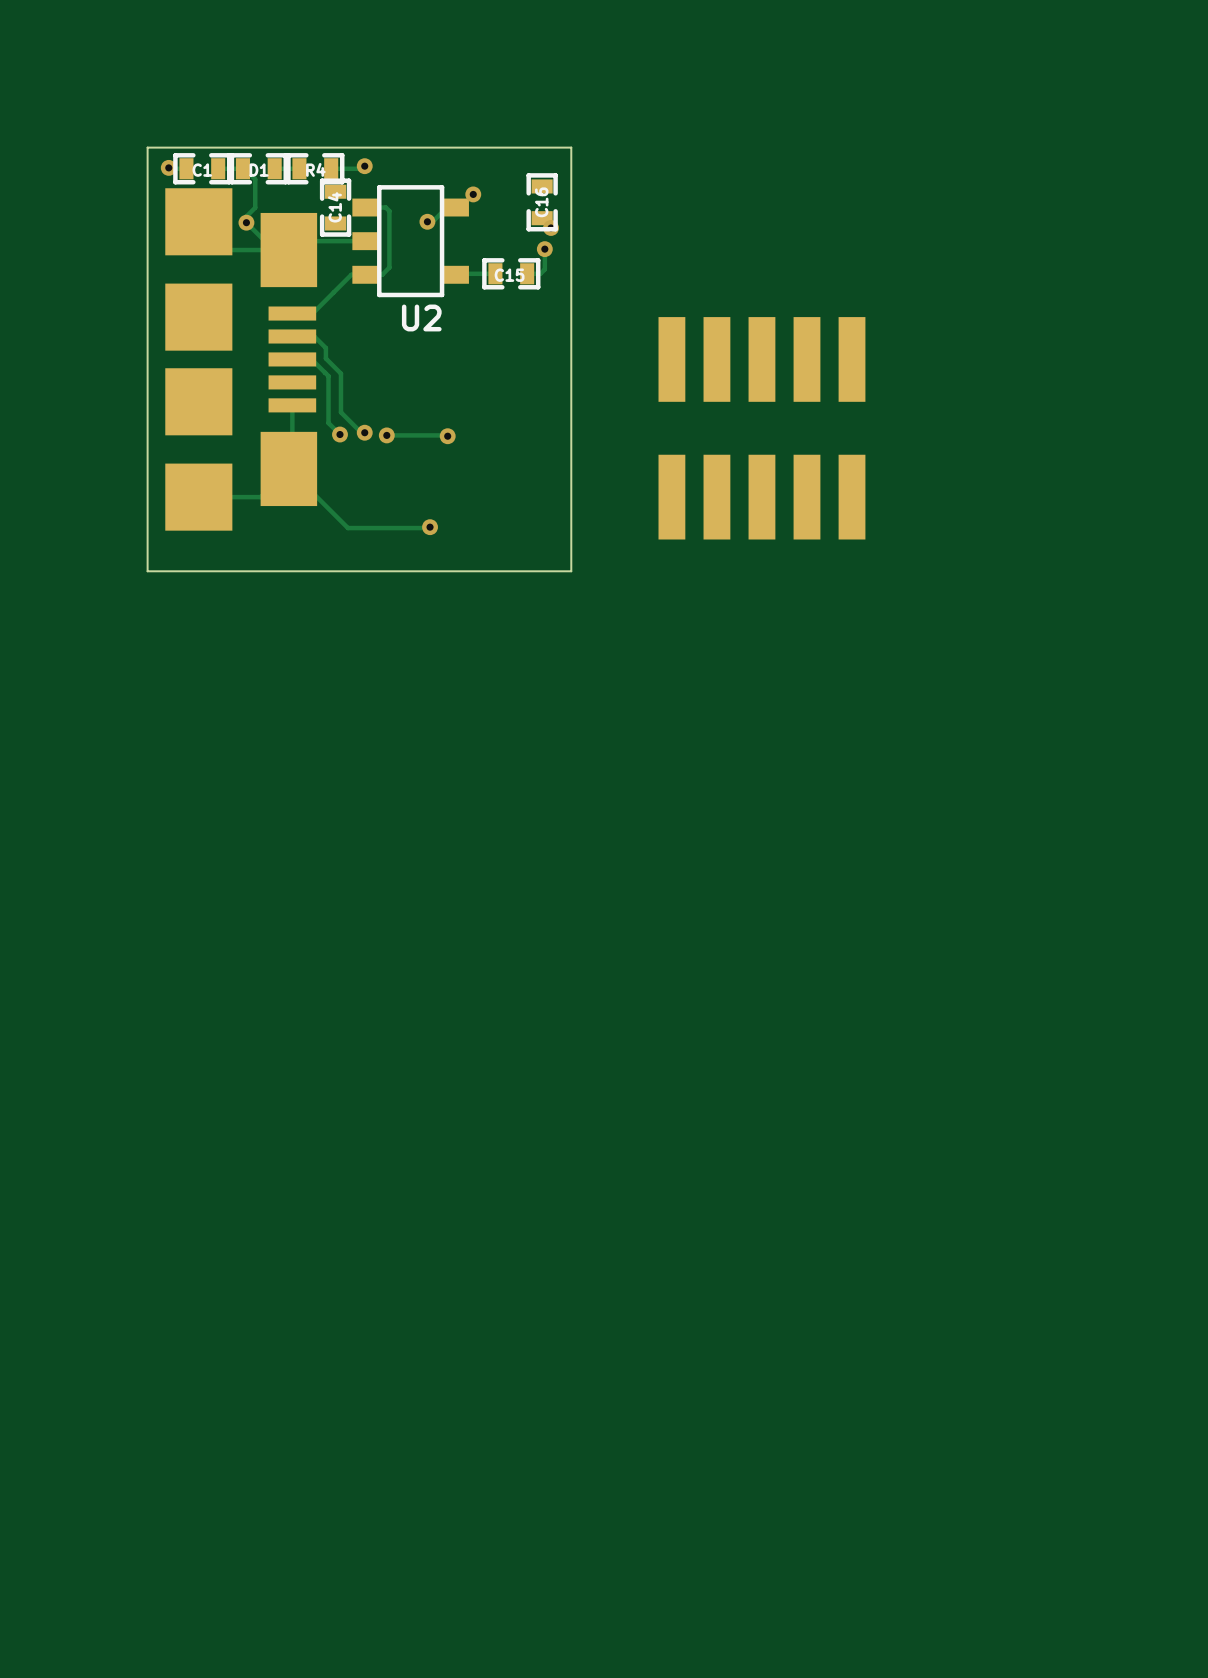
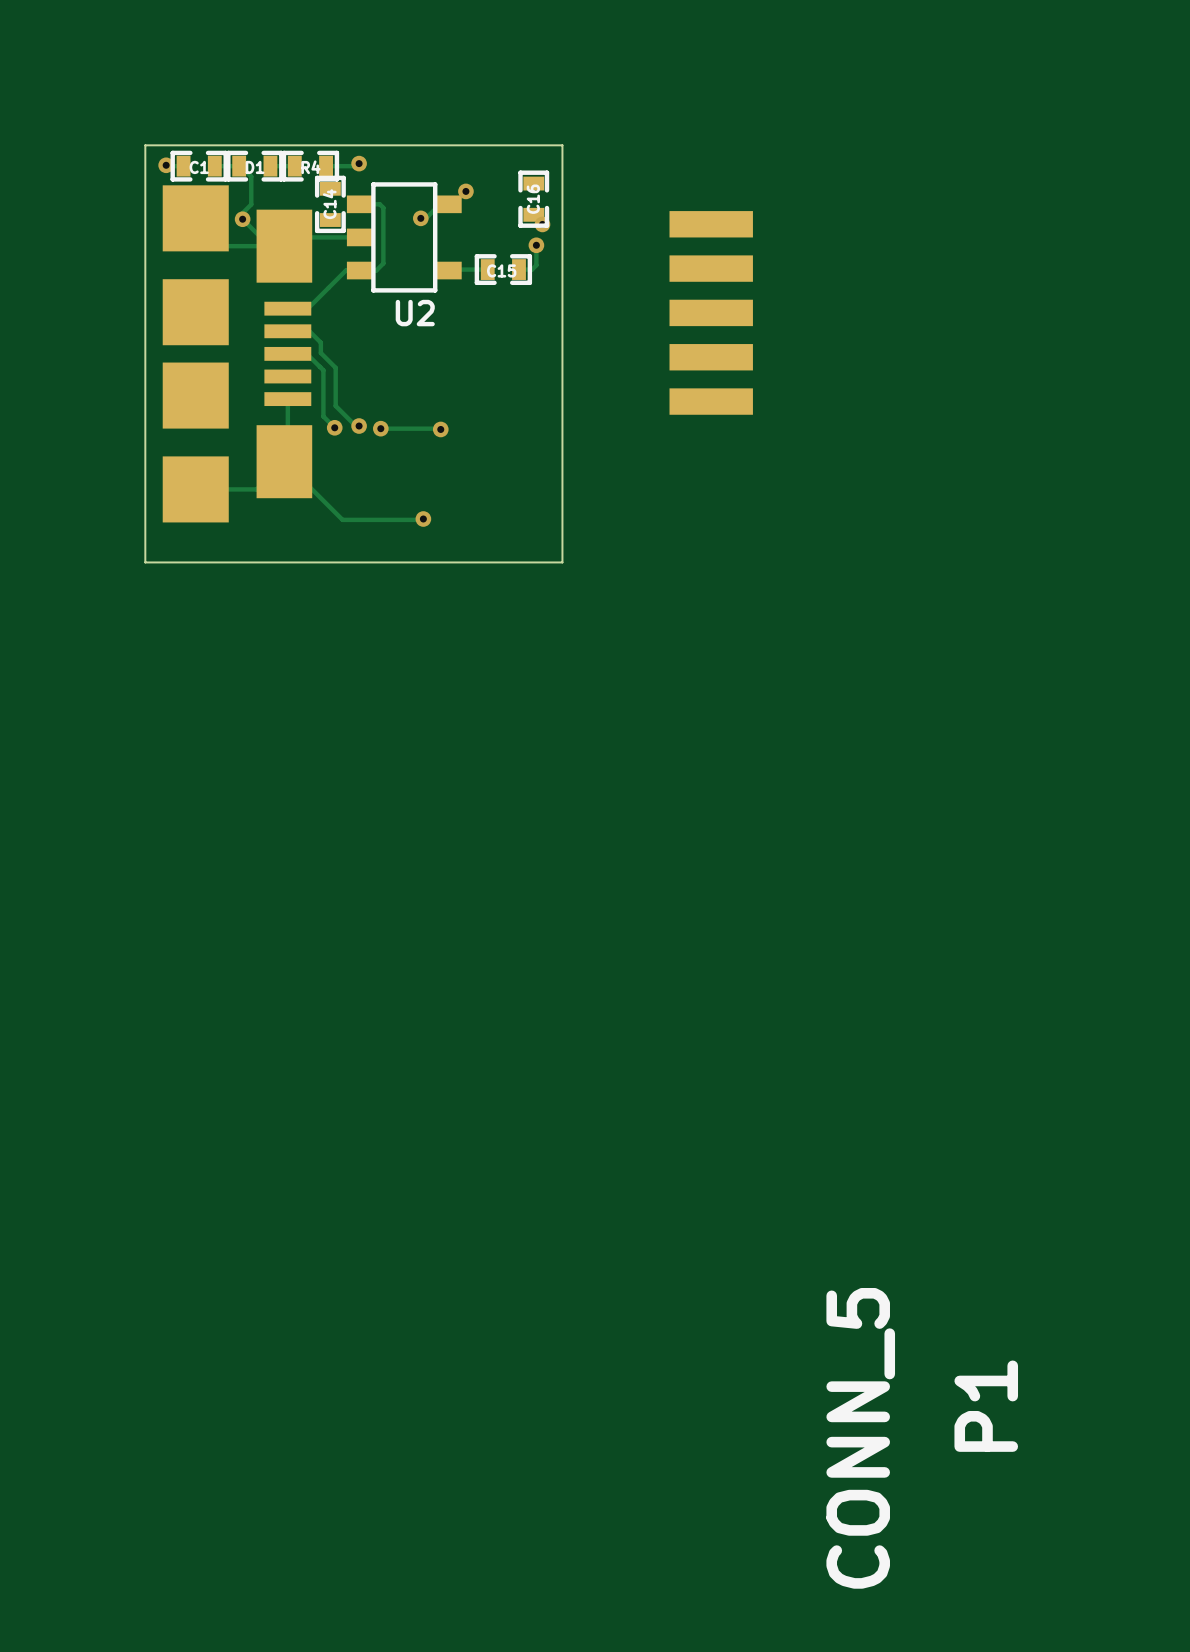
P1: none -> CONN_5 (711, 312)
part: (761, 428) -> none

